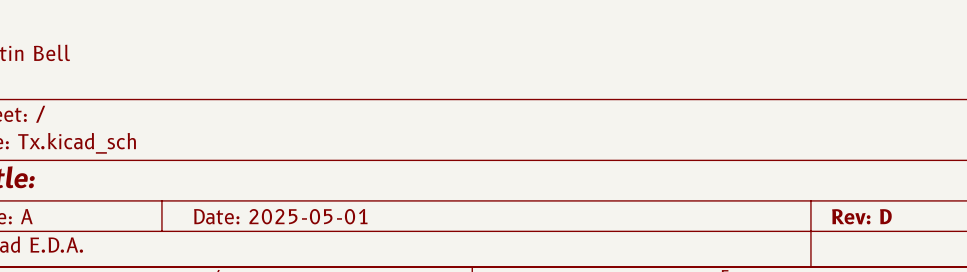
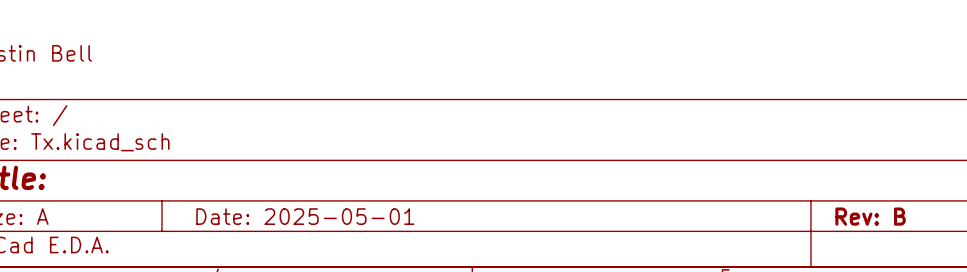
title block: Rev: D (861, 216) -> Rev: B (870, 216)

